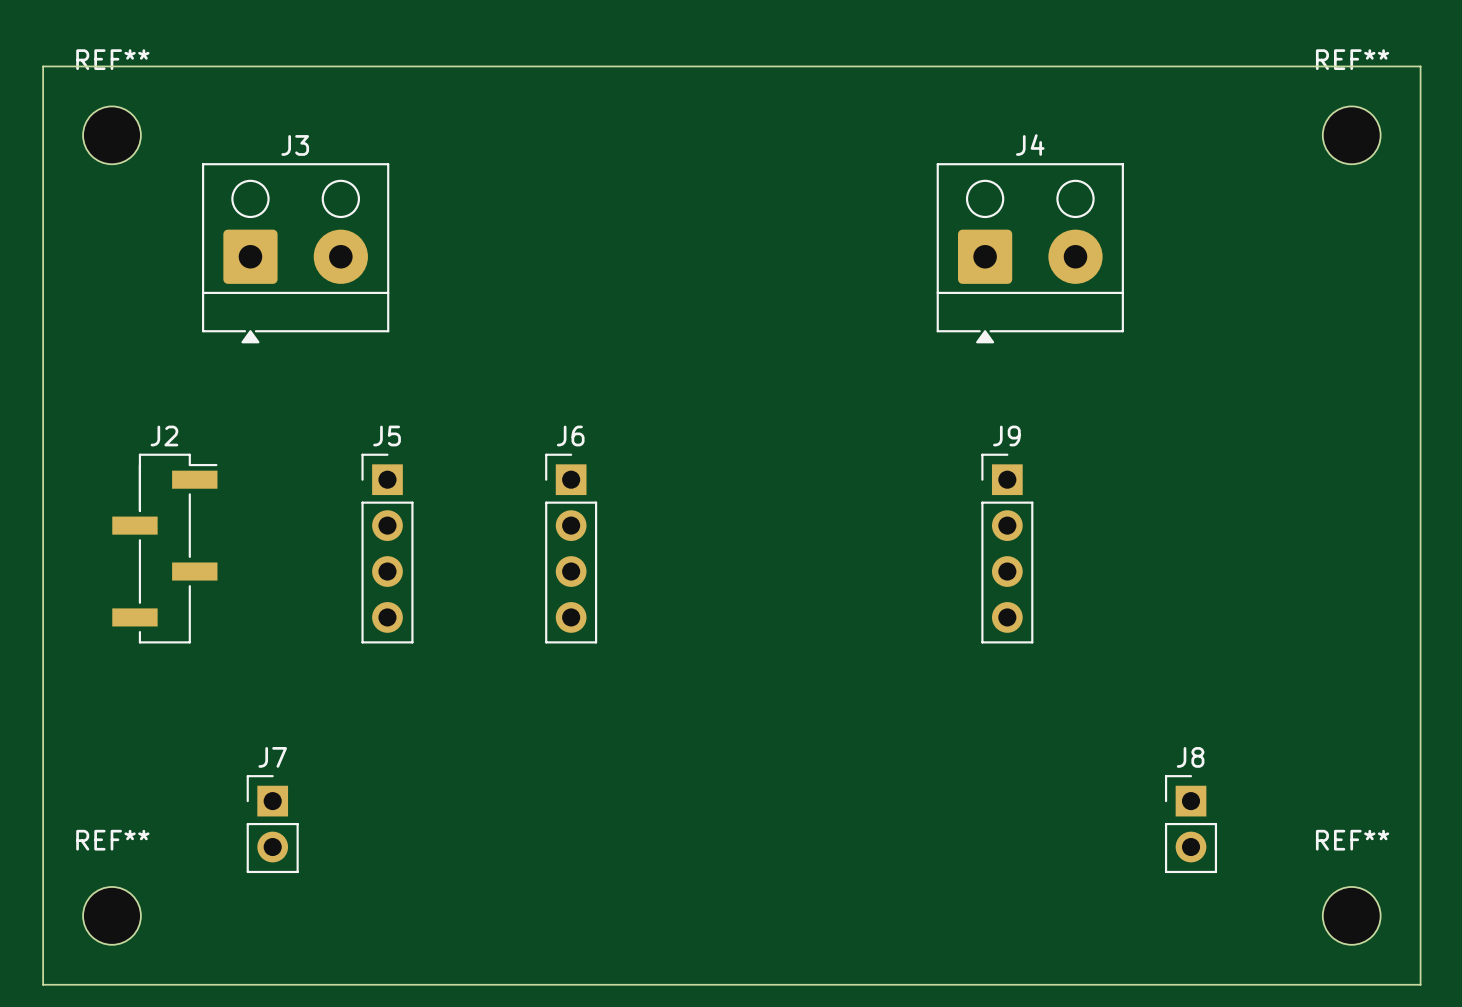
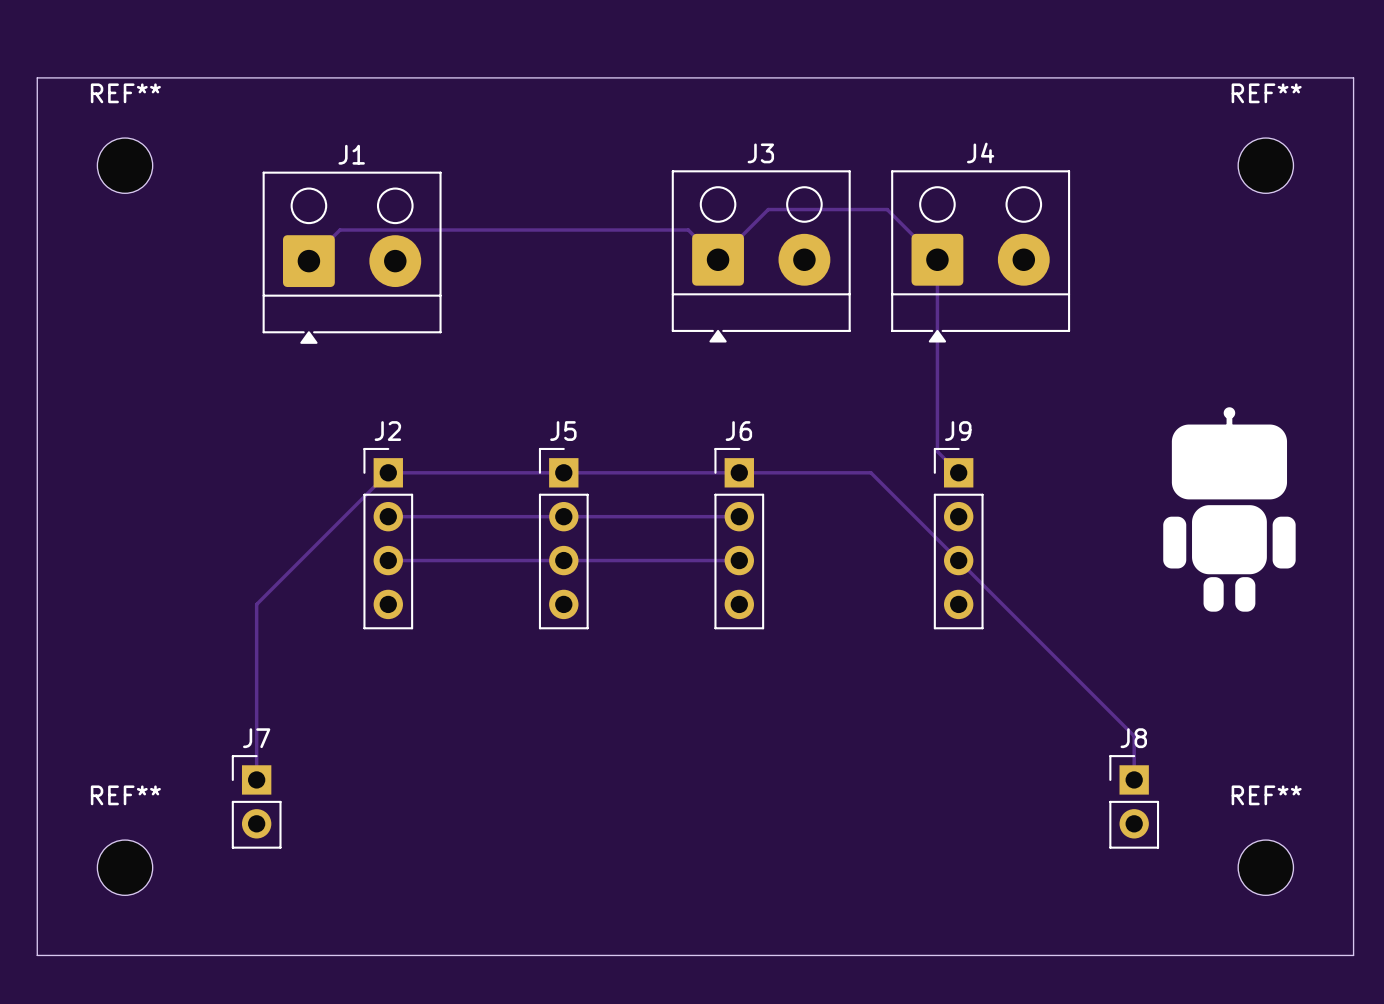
REF** position: (111, 135) -> (125, 165)
REF** position: (1351, 135) -> (1265, 165)
J3 position: (295, 253) -> (761, 256)
J1: none -> (352, 257)
track: none -> (308, 261) (340, 230) (688, 230) (718, 259) (768, 209) (887, 209) (937, 259) (937, 451) (958, 472)
drawing: none -> [1163, 407, 1296, 612]
J2 footprint: [112, 453, 218, 644] -> [363, 447, 414, 630]
track: none -> (388, 516) (739, 516)
J5 position: (387, 548) -> (563, 538)
J6 position: (571, 548) -> (739, 538)
track: none -> (388, 560) (739, 560)
track: none -> (256, 779) (256, 604) (388, 472) (870, 472) (1134, 736) (1134, 779)
REF** position: (111, 915) -> (125, 867)
REF** position: (1351, 915) -> (1265, 867)

